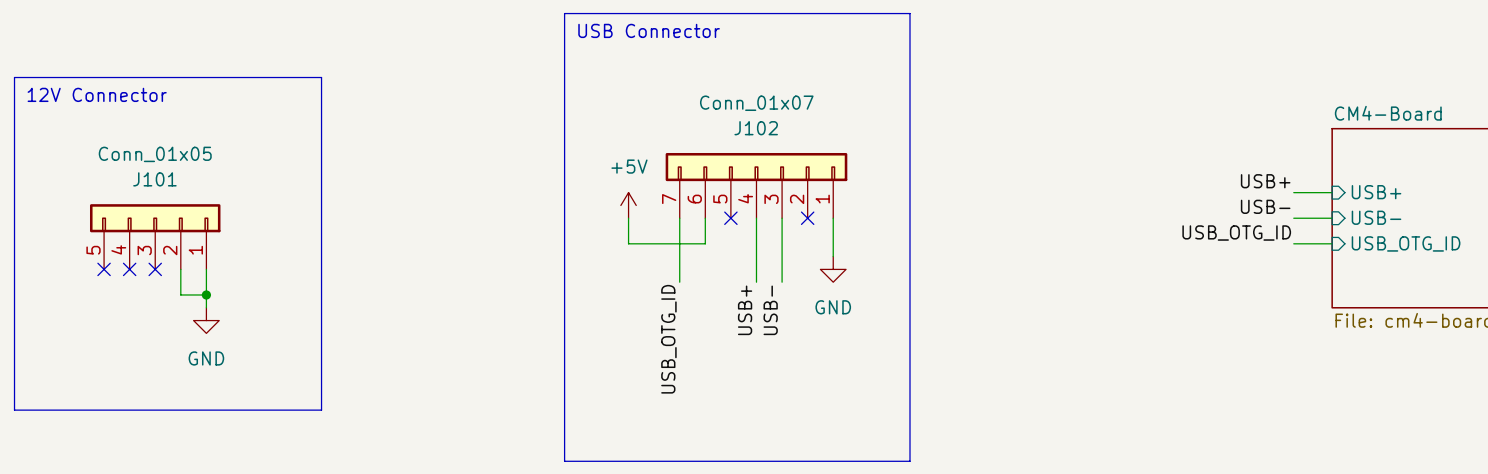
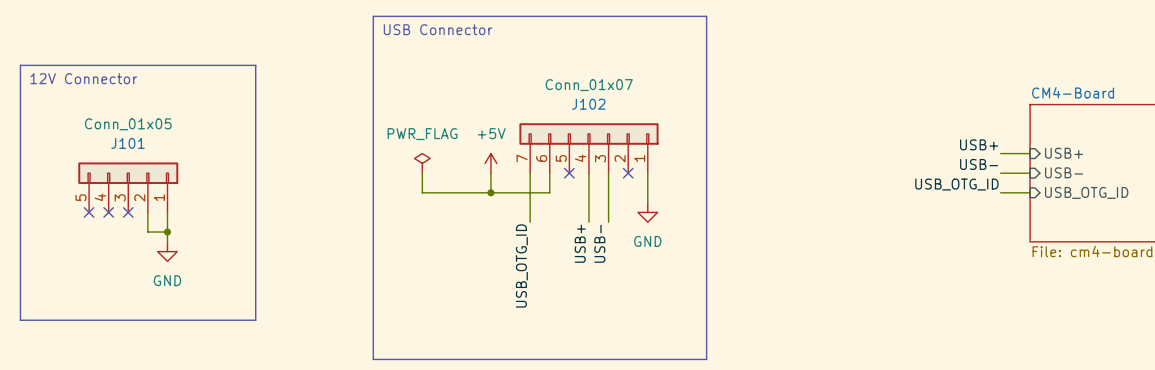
line: (564, 13) (564, 461) -> (441, 16) (373, 16) (373, 359) (441, 359)
text position: USB Connector (649, 30) -> USB Connector (438, 29)
power symbol: none -> PWR_FLAG (422, 163)
wire: none -> (422, 173) (422, 192) (490, 192)
junction: none -> (490, 192)

